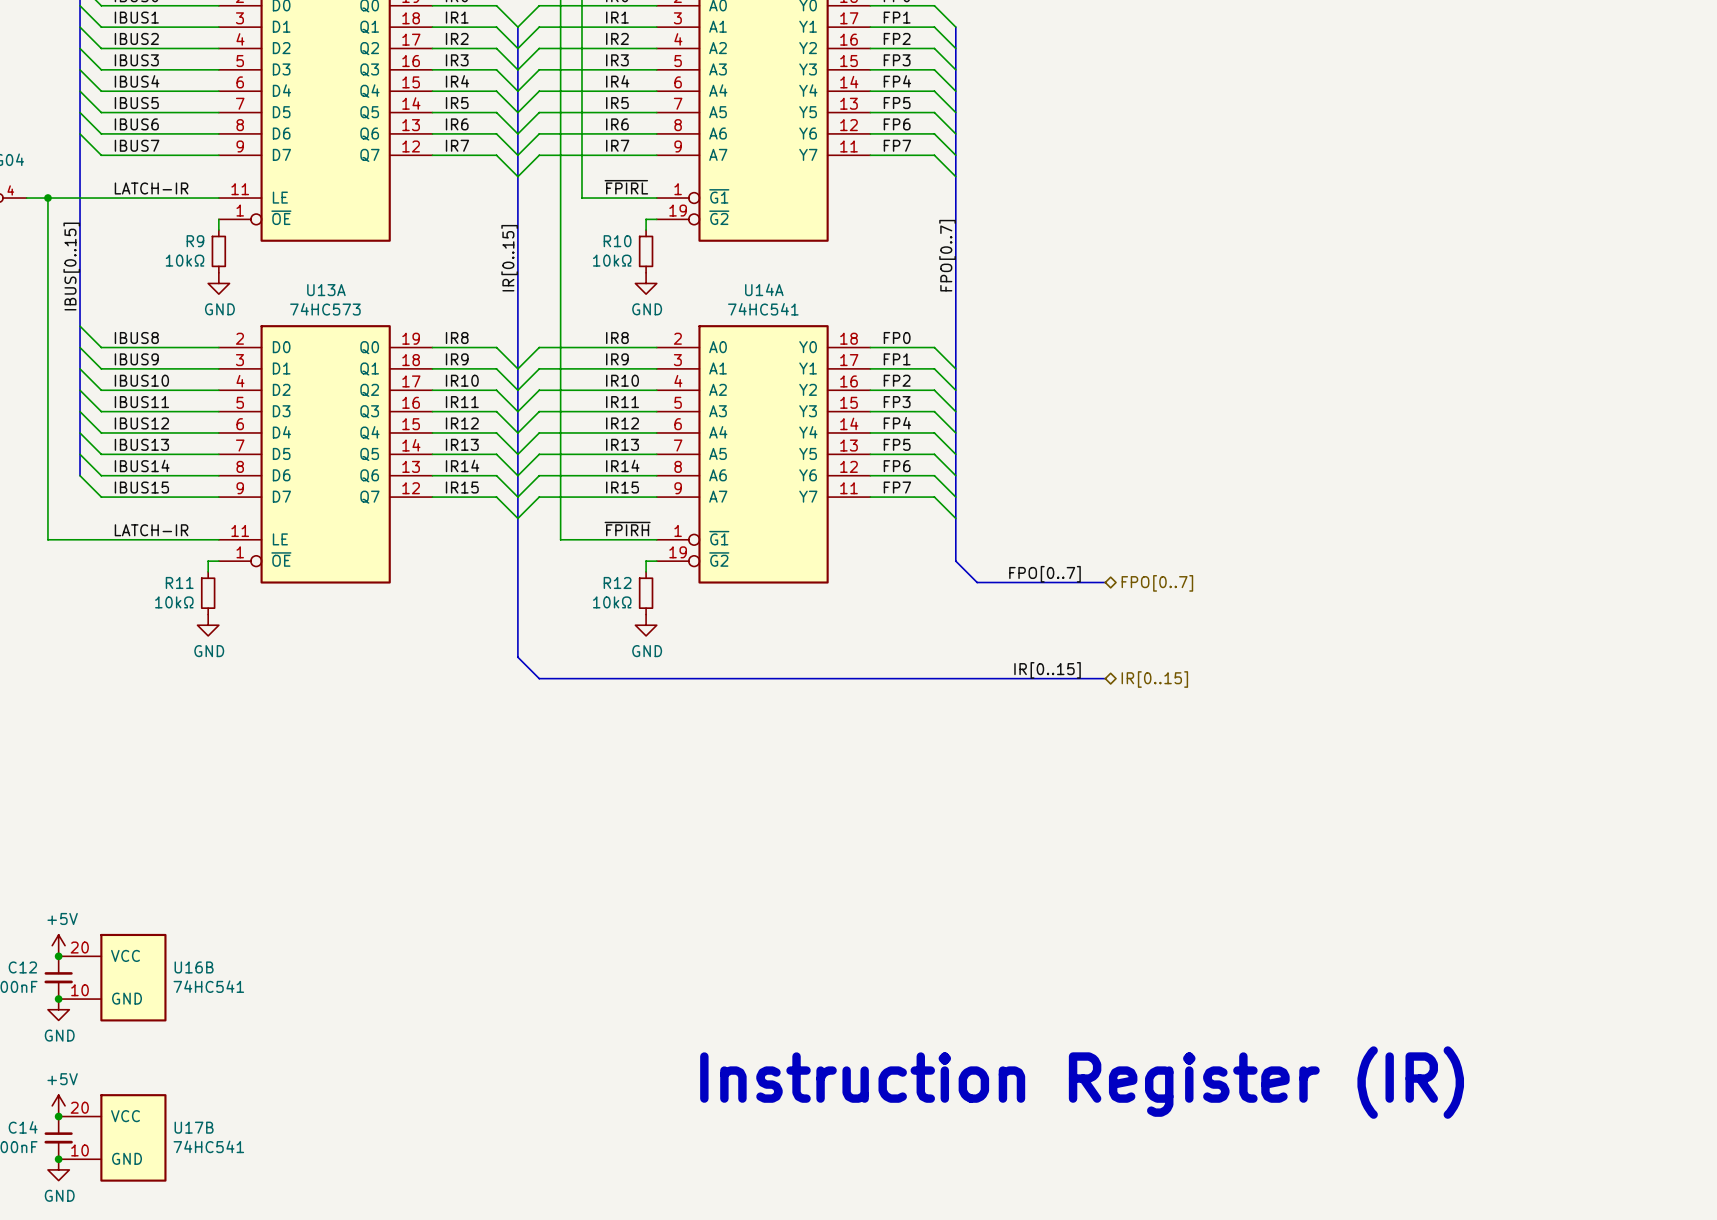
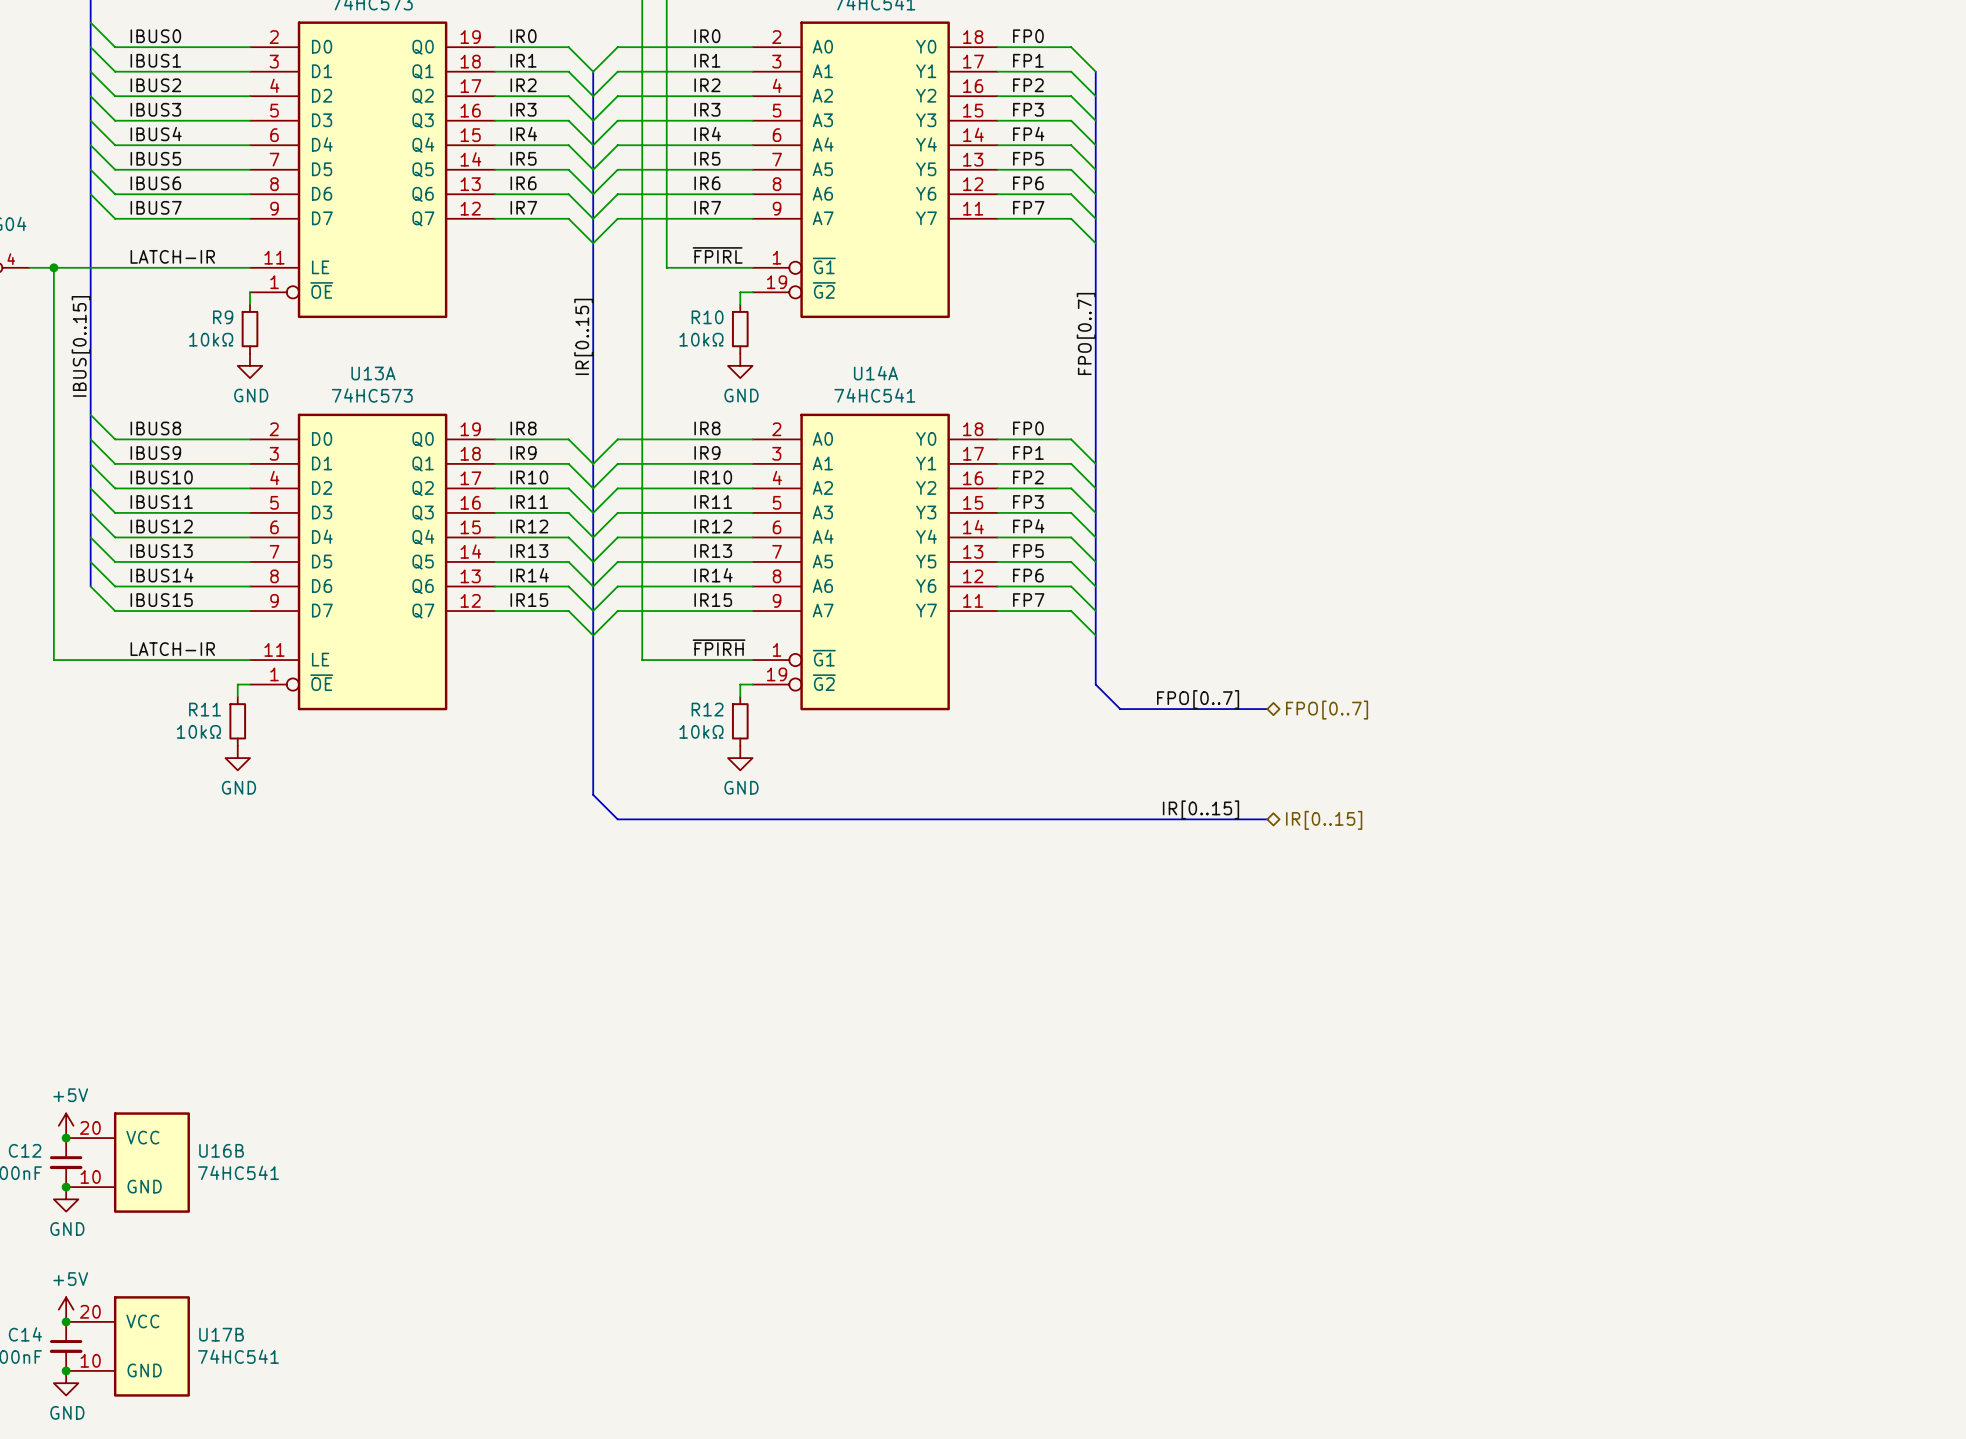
text: Instruction Register (IR) (1082, 1082) -> none

